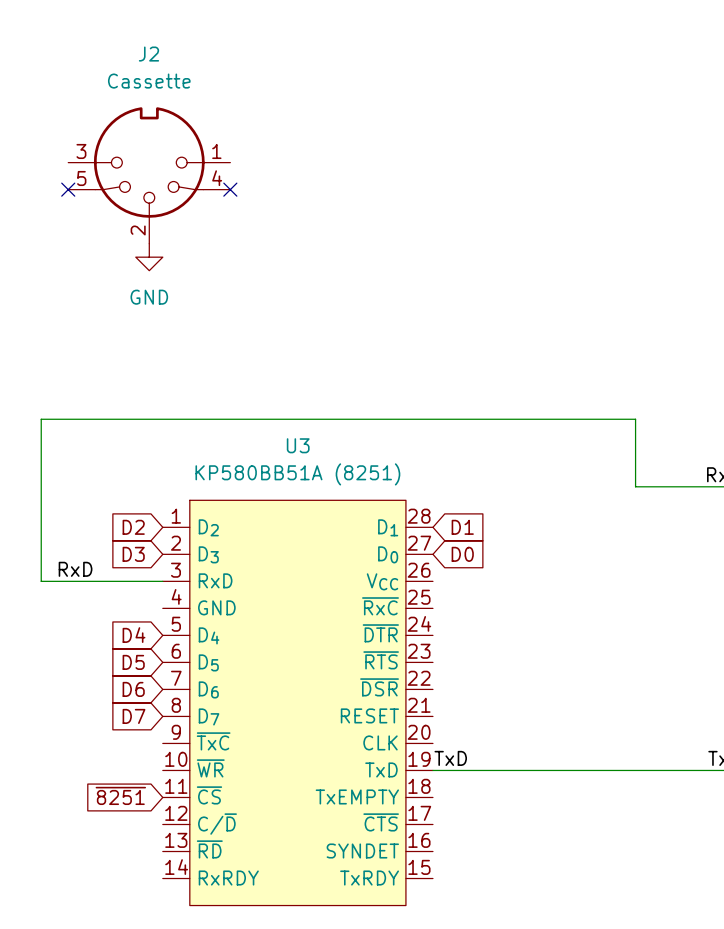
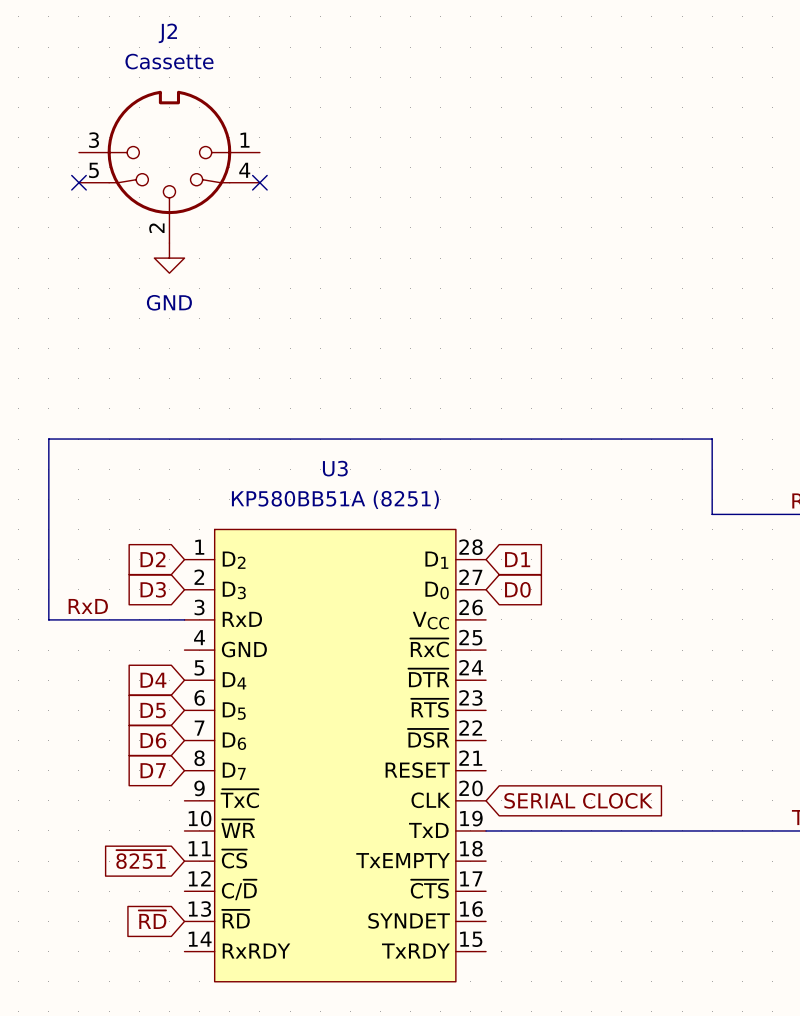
global label: none -> SERIAL CLOCK (578, 800)
label: TxD (450, 758) -> none
global label: none -> ~{RD} (152, 919)

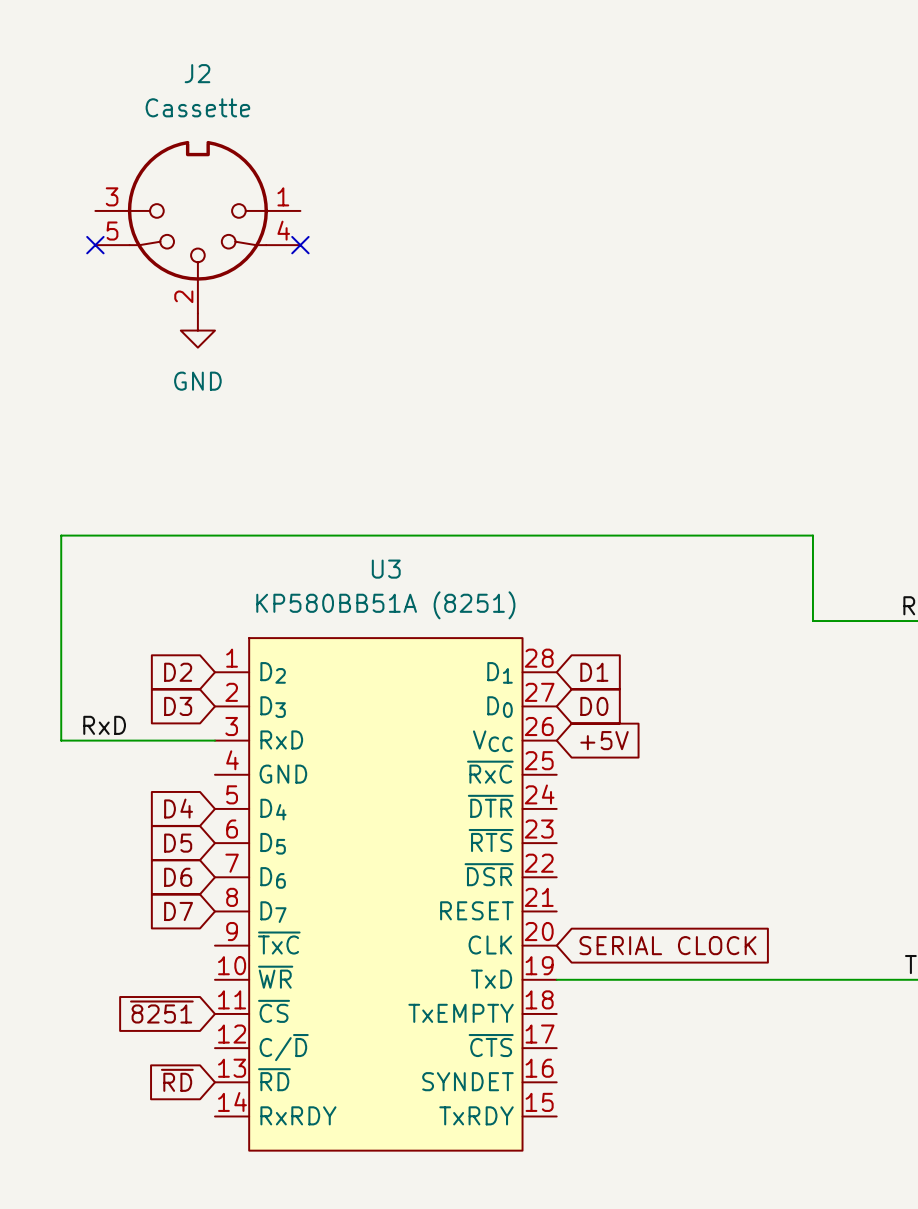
global label: none -> +5V (604, 740)

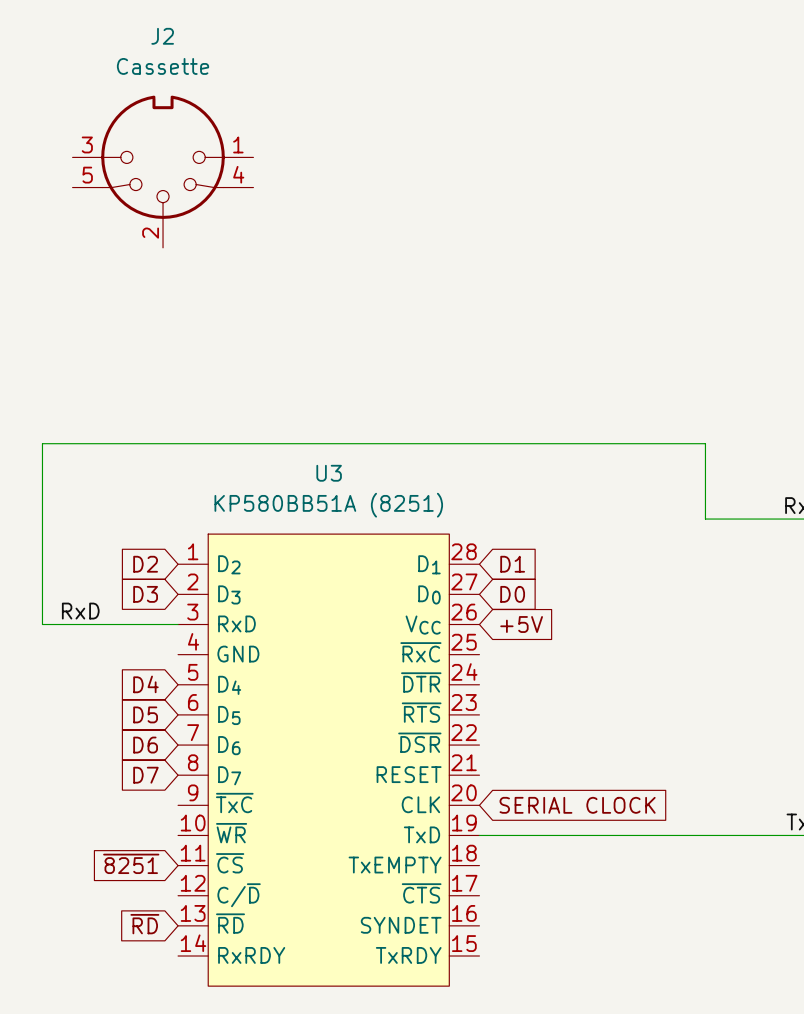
no-connect mark: (95, 245) -> none
no-connect mark: (300, 245) -> none
power symbol: GND (197, 330) -> none

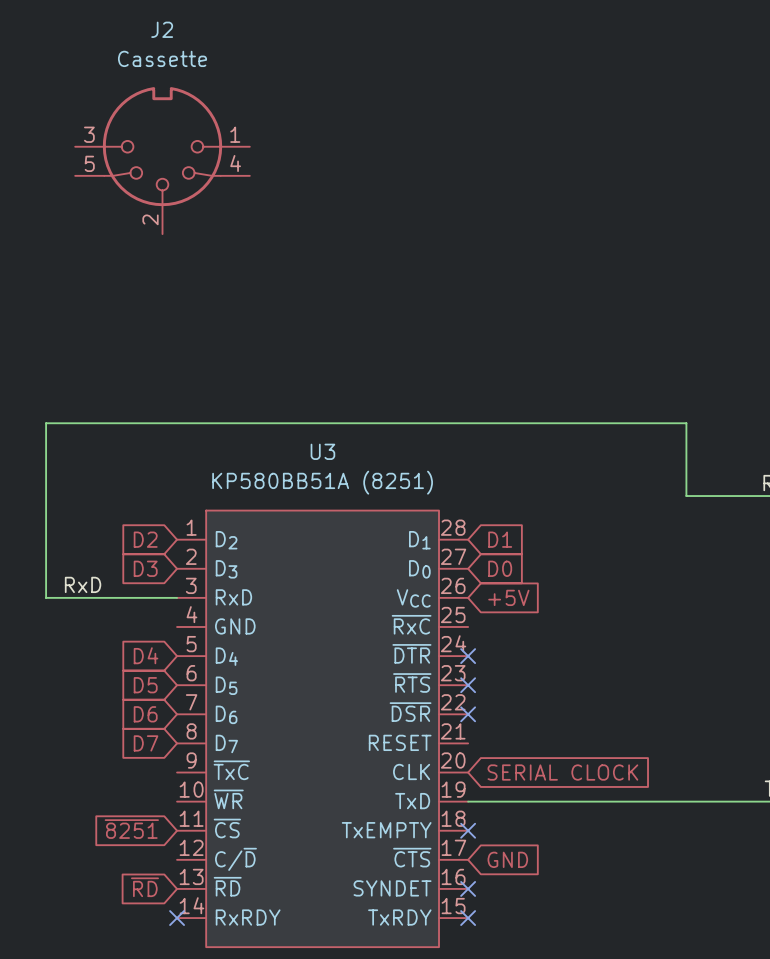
no-connect mark: none -> (468, 656)
no-connect mark: none -> (468, 685)
no-connect mark: none -> (468, 714)
no-connect mark: none -> (468, 830)
global label: none -> GND (507, 859)
no-connect mark: none -> (468, 888)
no-connect mark: none -> (177, 918)
no-connect mark: none -> (468, 918)

